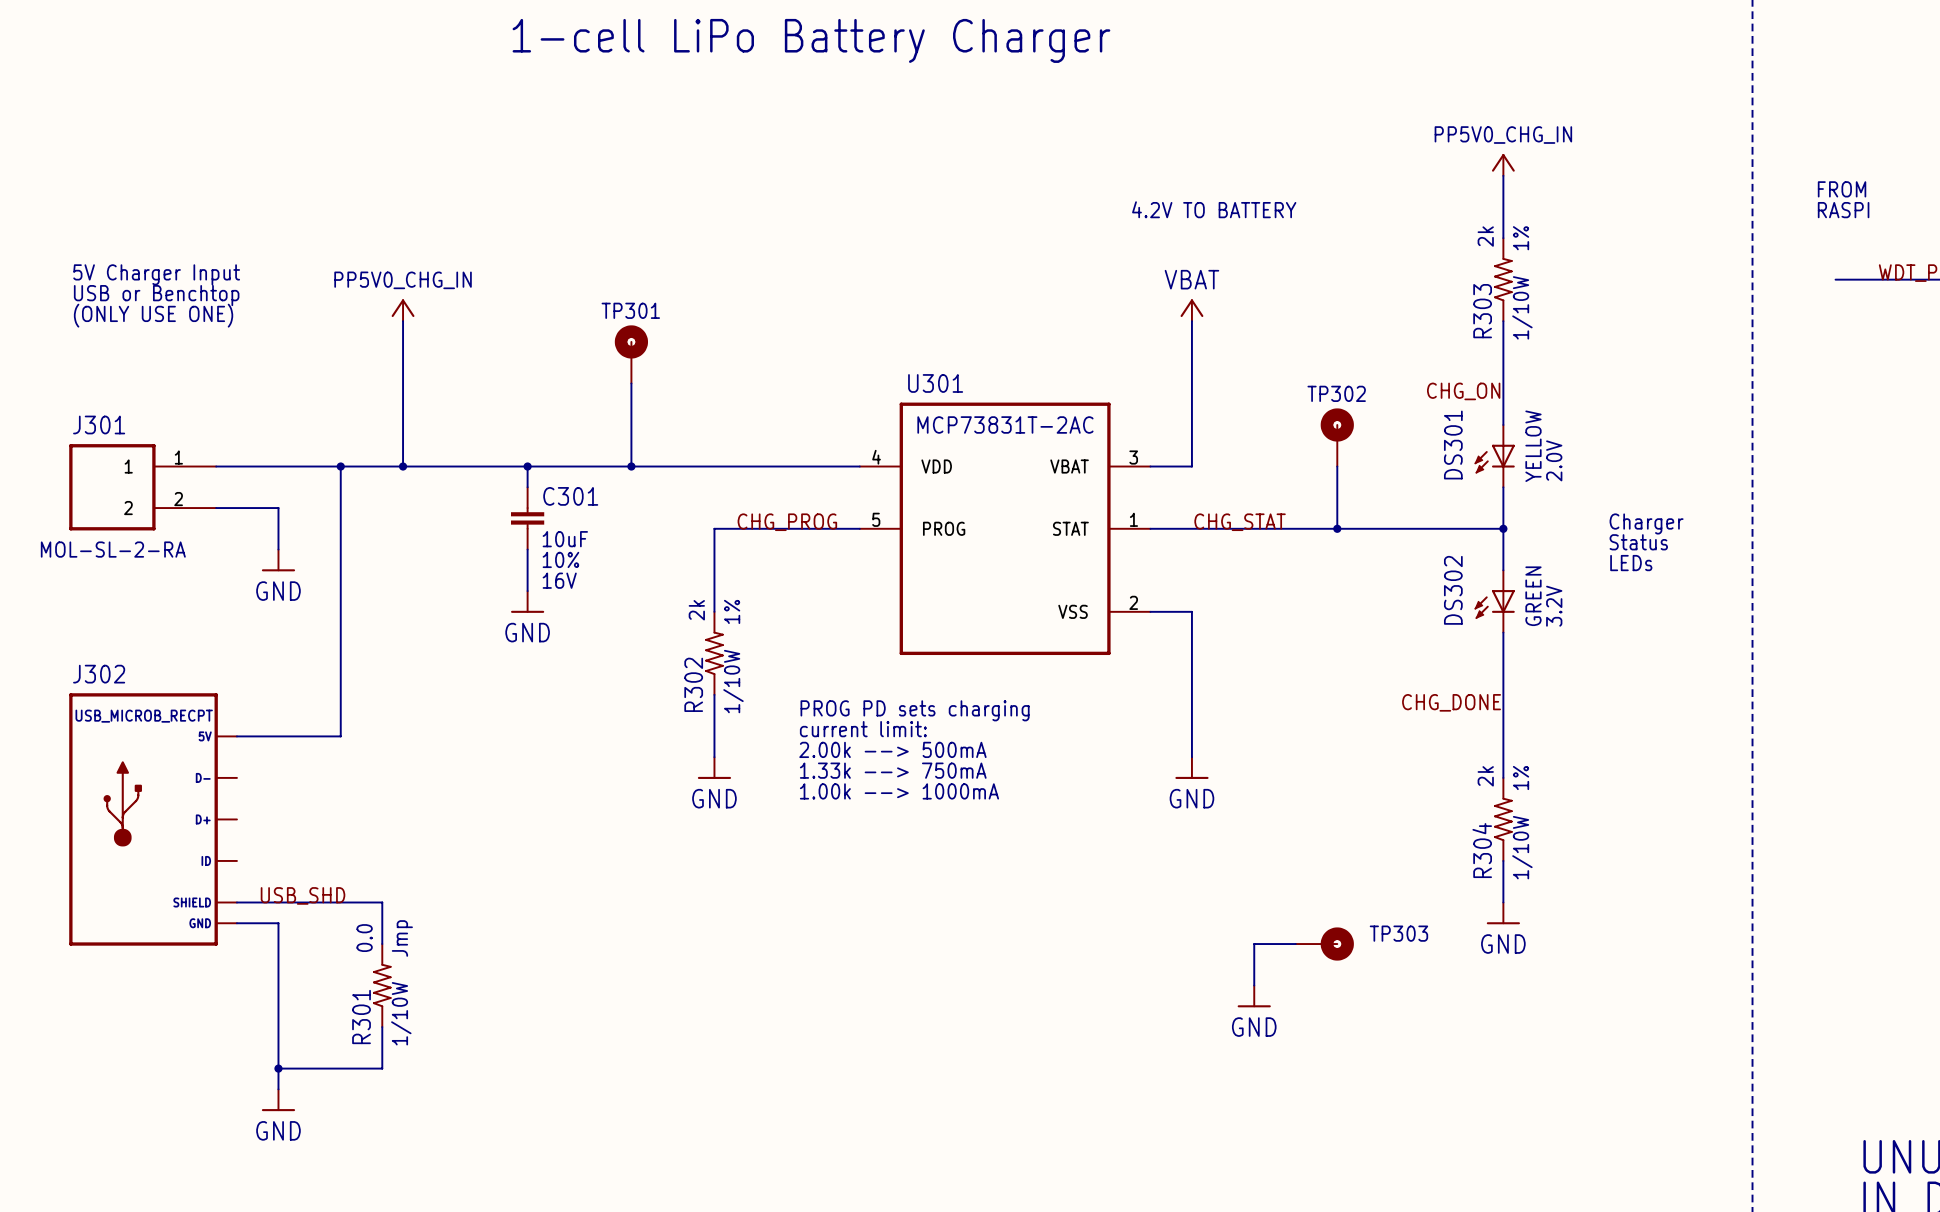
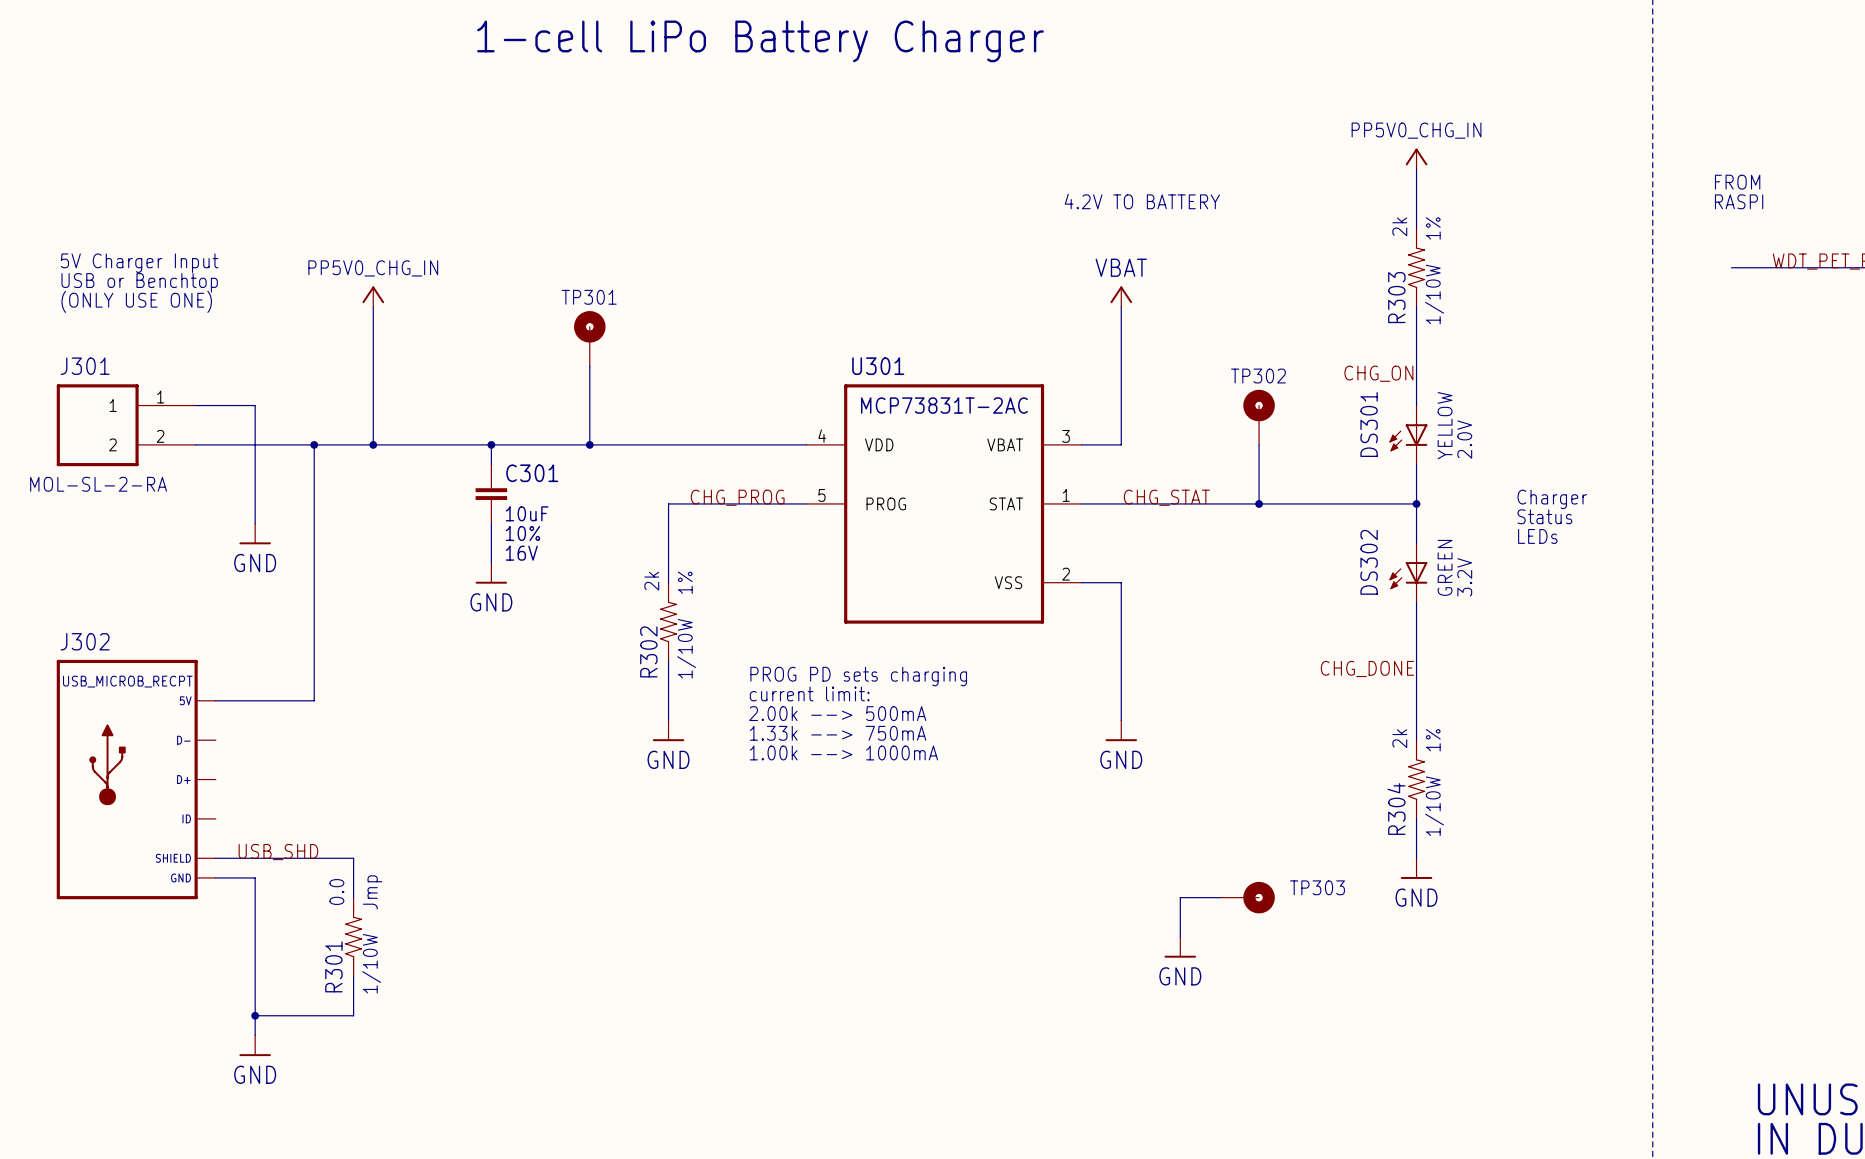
J301 position: (142, 487) -> (126, 425)
wire: (216, 508) (278, 508) -> (196, 405) (255, 405) (255, 484)

